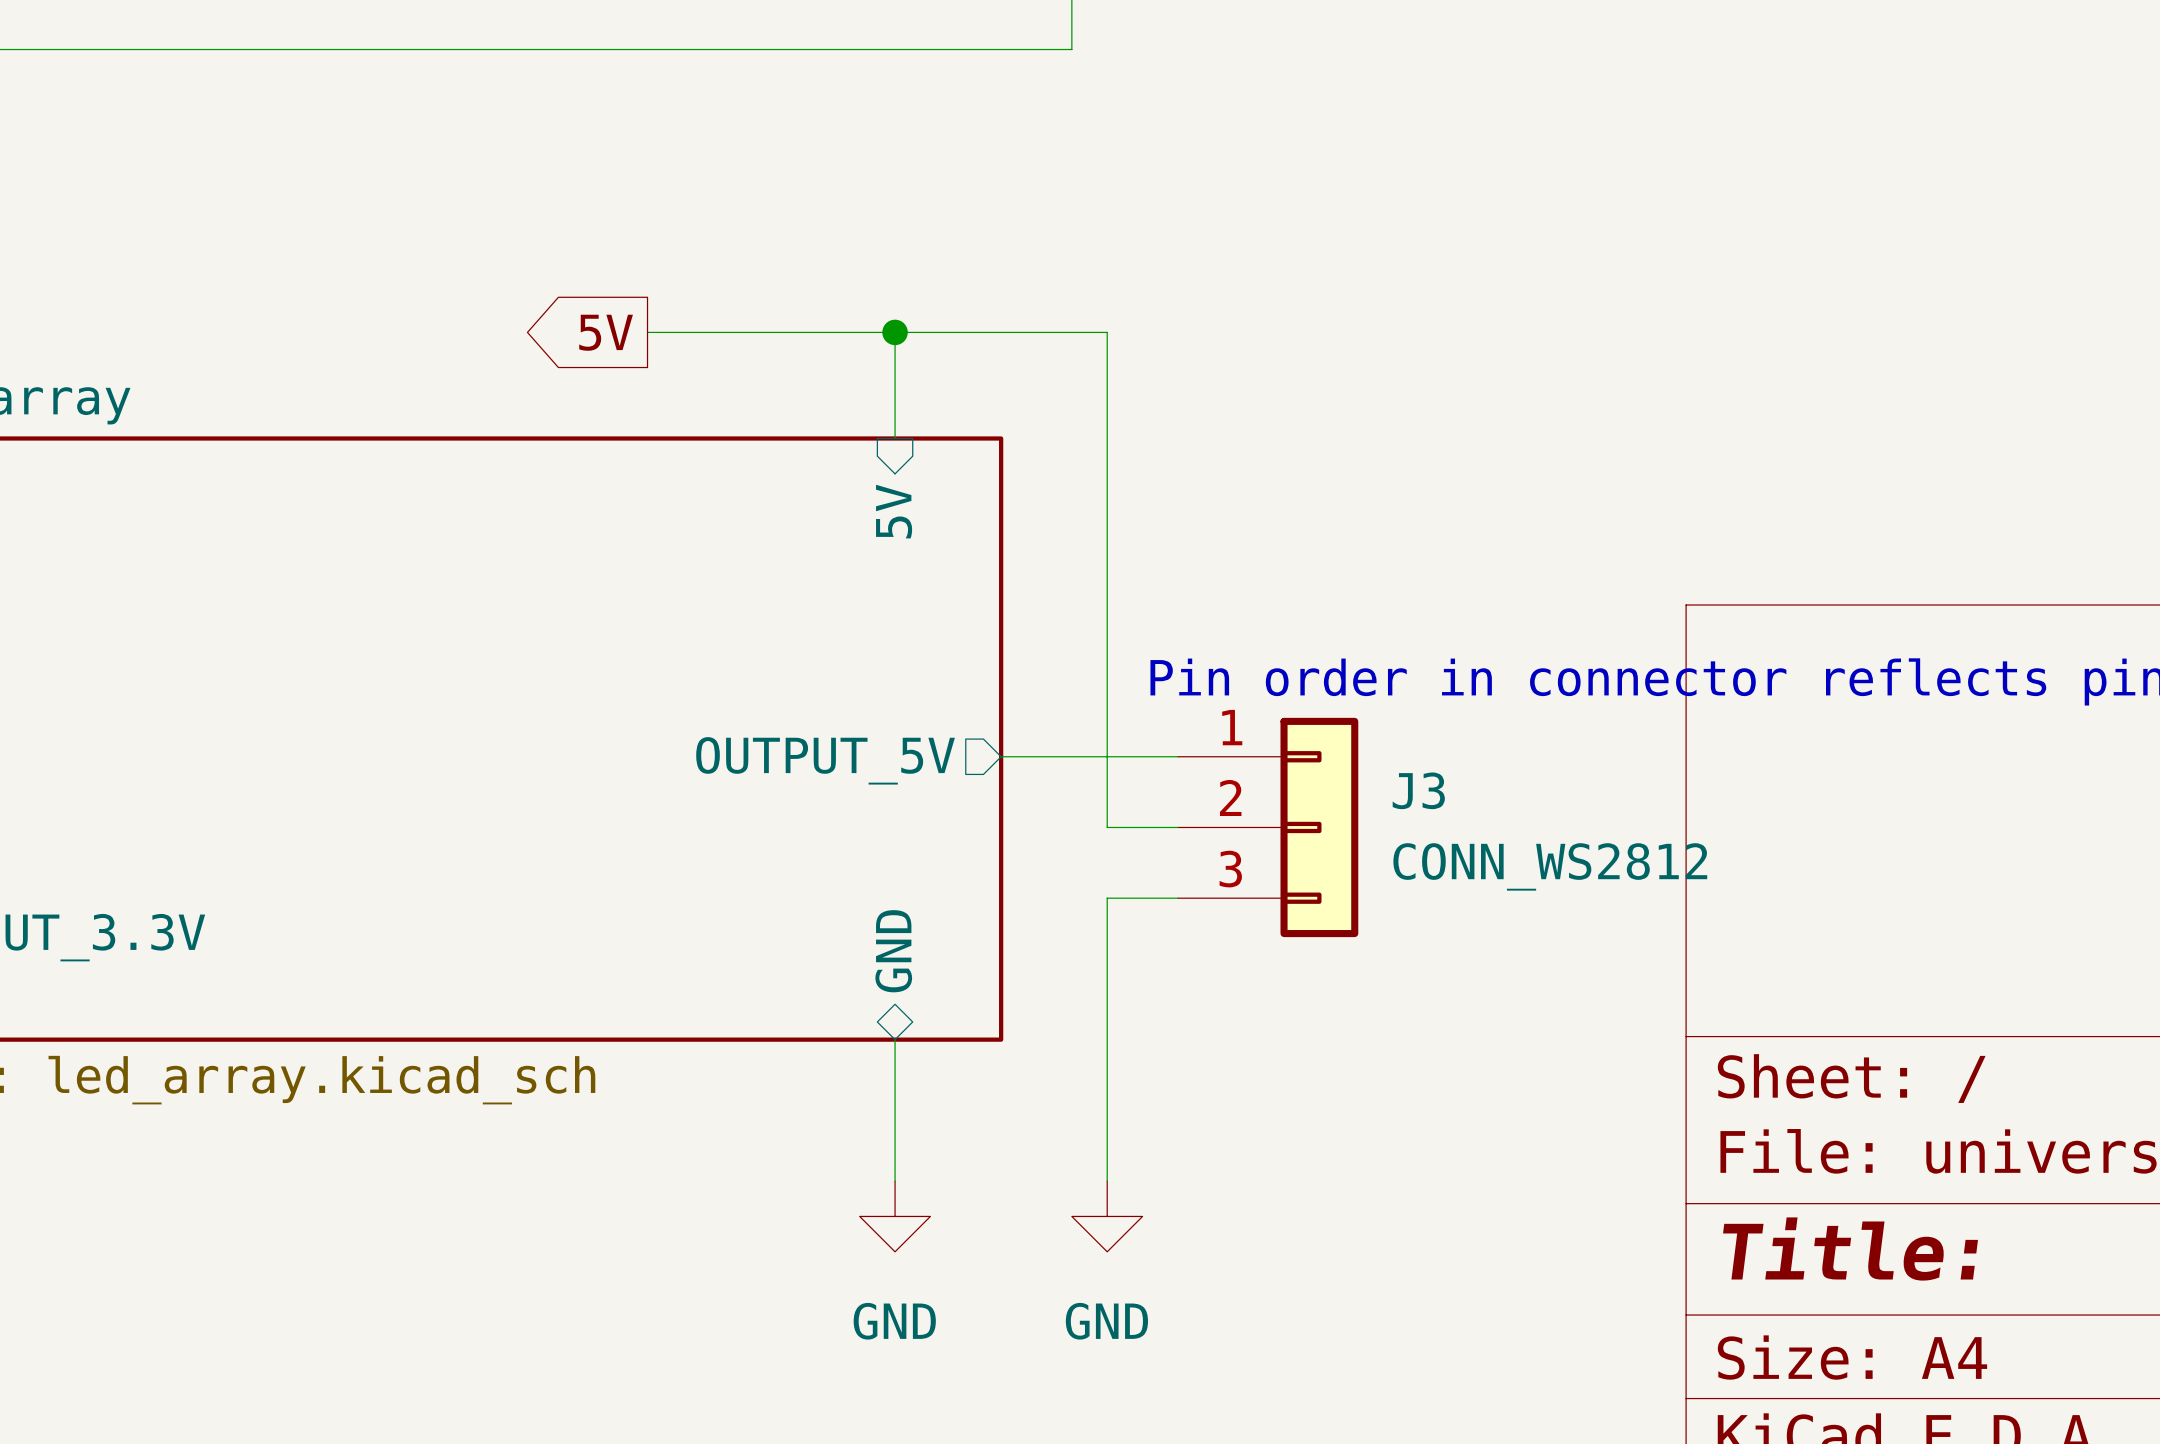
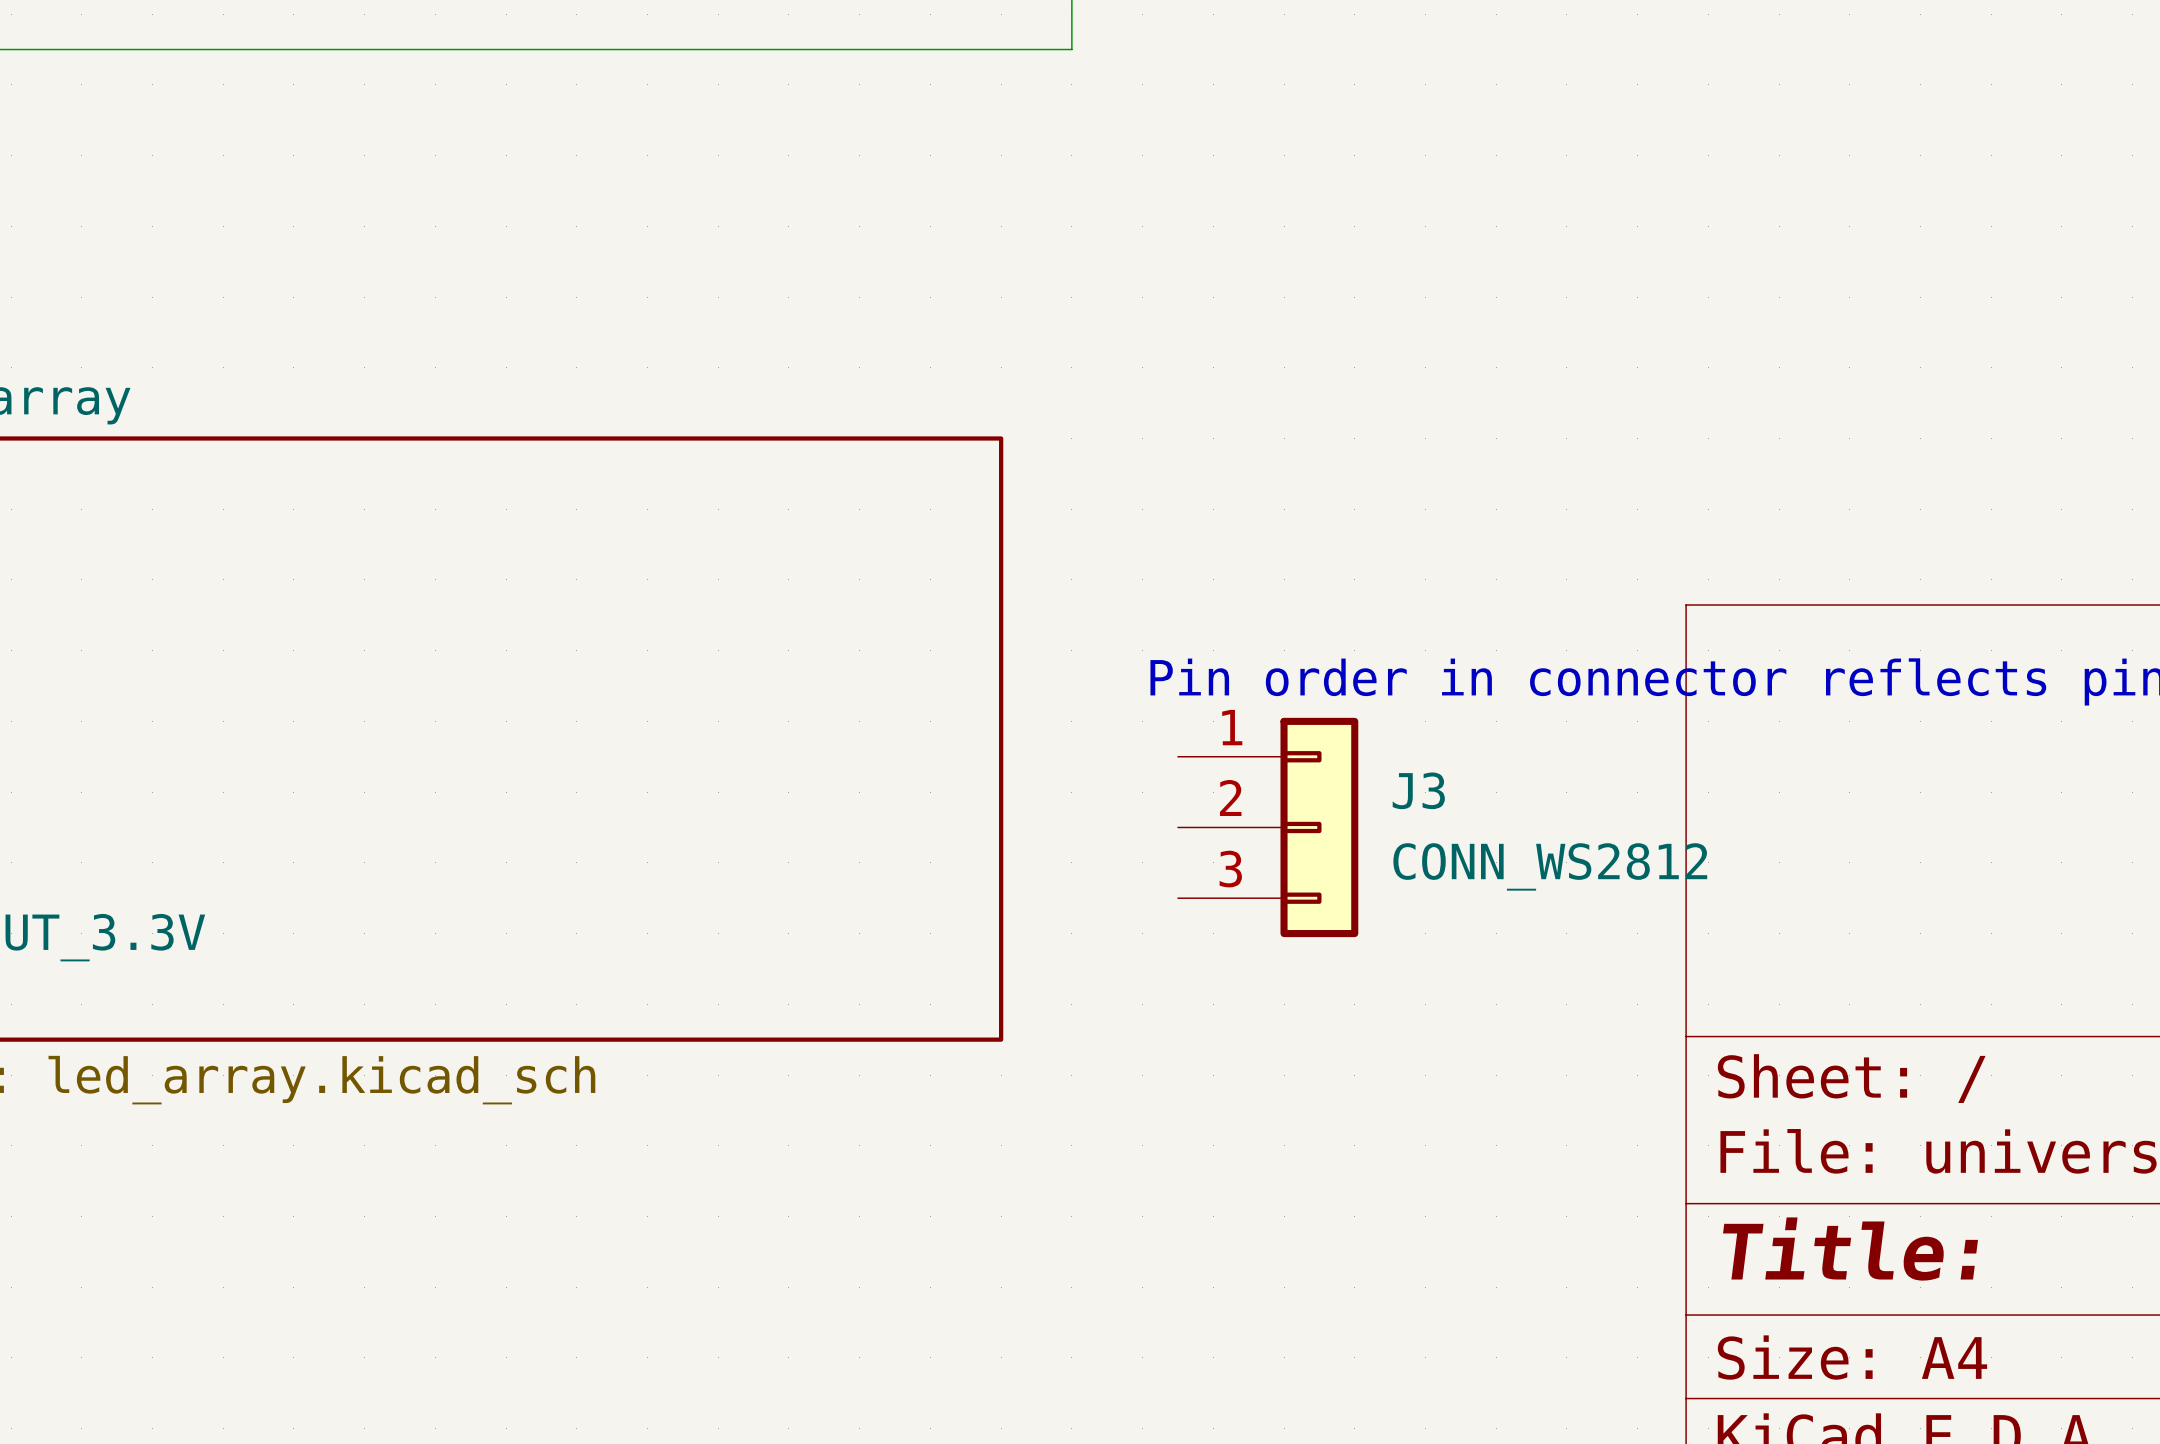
global label: 5V (606, 332) -> none
wire: (647, 332) (1107, 332) (1107, 827) (1177, 827) -> none
wire: (895, 332) (895, 438) -> none
junction: (895, 332) -> none
sheet pin: 5V (894, 511) -> none
wire: (1001, 756) (1177, 756) -> none
sheet pin: OUTPUT_5V (825, 760) -> none
wire: (1177, 898) (1107, 898) (1107, 1181) -> none
sheet pin: GND (893, 951) -> none
wire: (895, 1039) (895, 1181) -> none
power symbol: GND (895, 1216) -> none
power symbol: GND (1107, 1216) -> none

